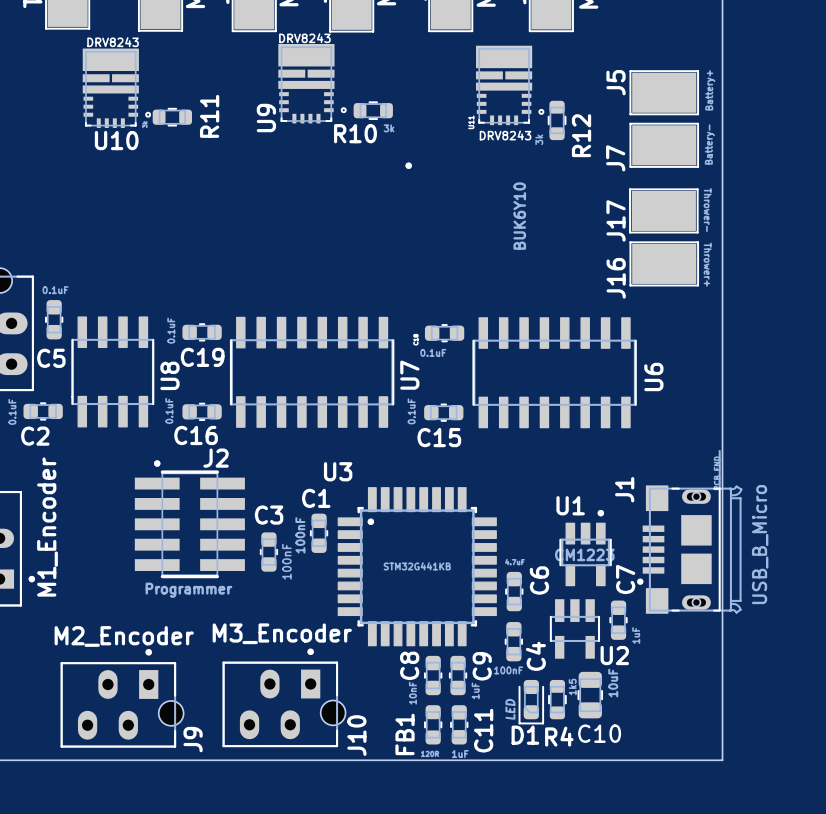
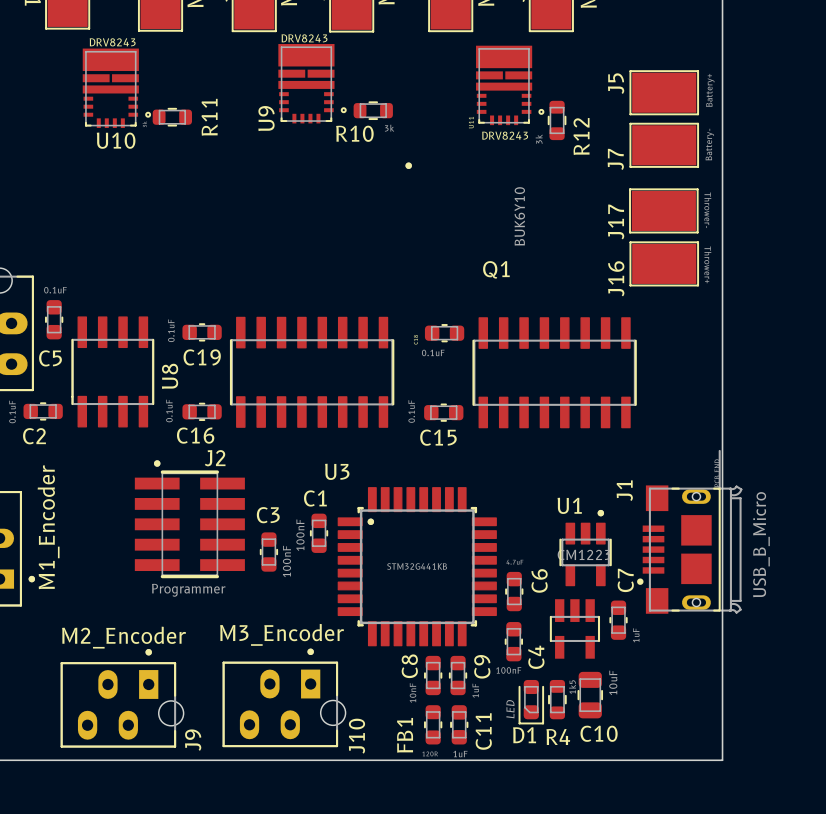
Q1 name: none -> Q1 (496, 269)
U7 name: U7 (409, 375) -> none
U6 name: U6 (653, 376) -> none
U2 name: U2 (614, 655) -> none

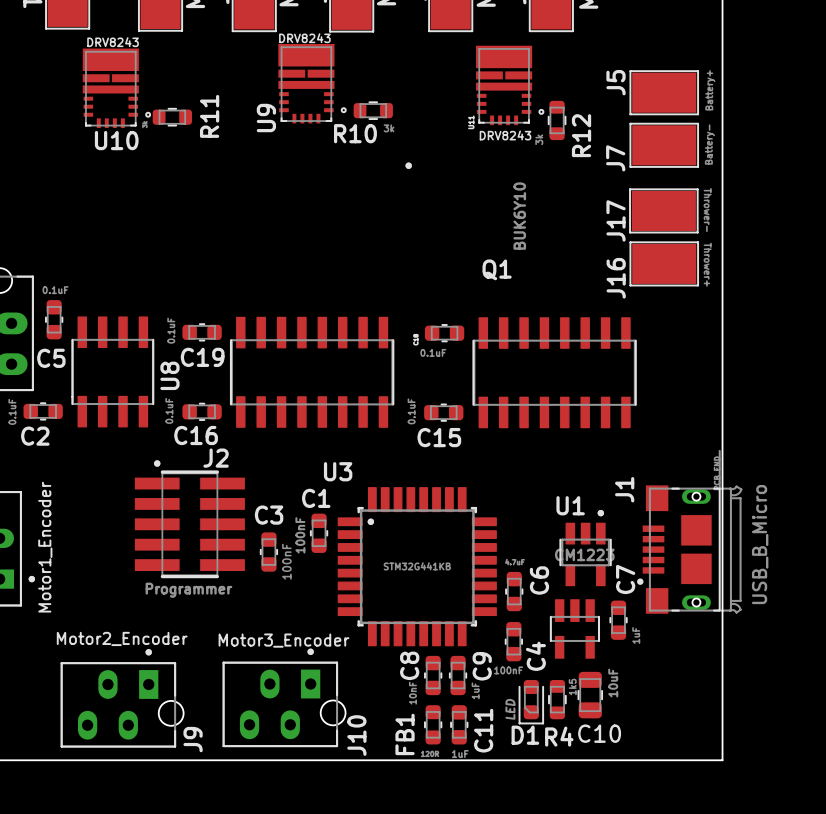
part value: M1_Encoder (48, 527) -> Motor1_Encoder (45, 547)
J10 value: M3_Encoder (282, 634) -> Motor3_Encoder (284, 640)
J9 value: M2_Encoder (123, 637) -> Motor2_Encoder (122, 638)

